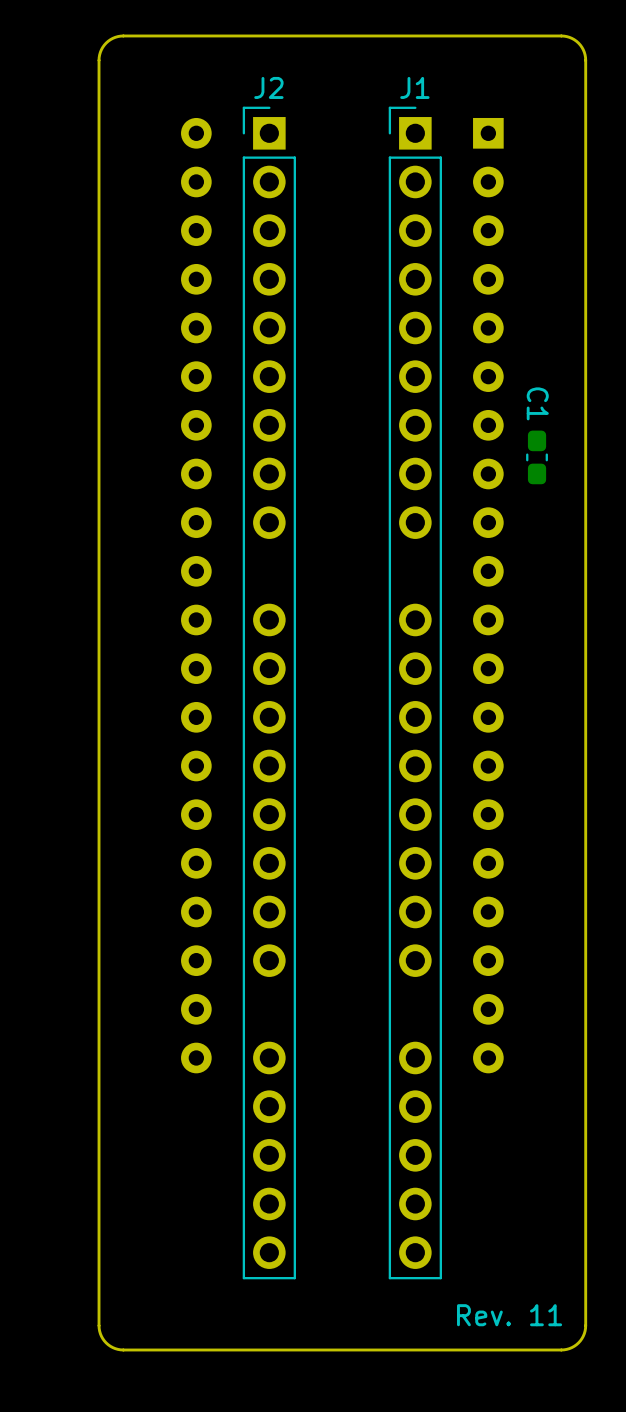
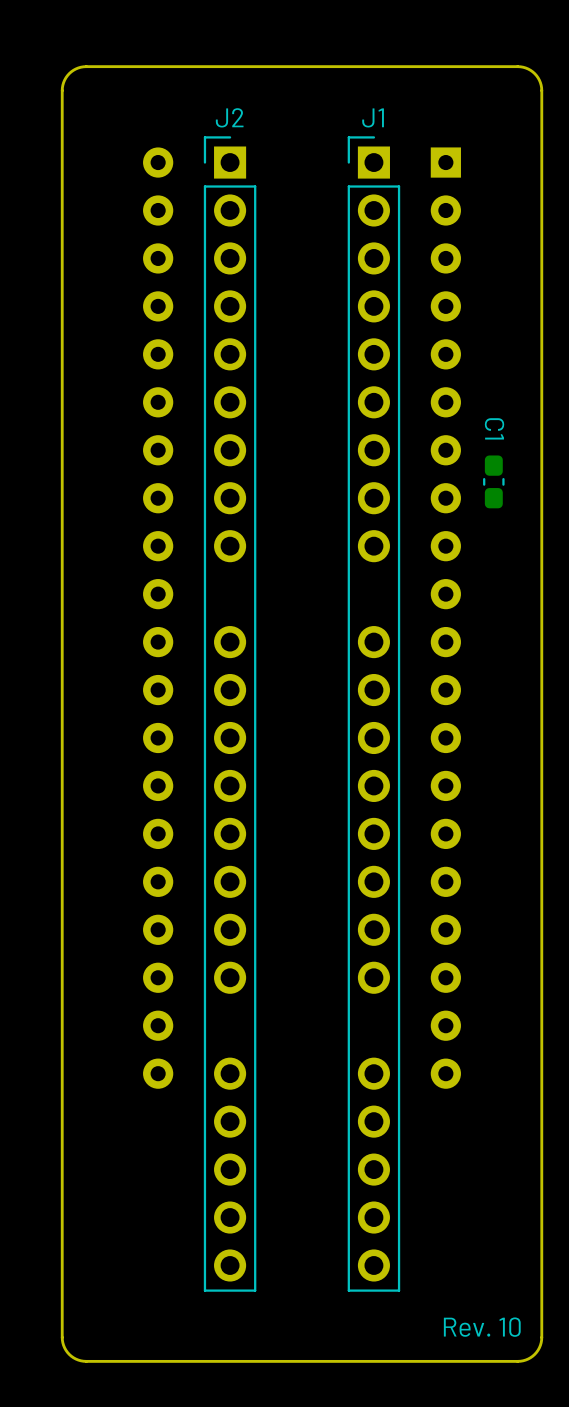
text: Rev. 11 (509, 1315) -> Rev. 10 (482, 1327)

